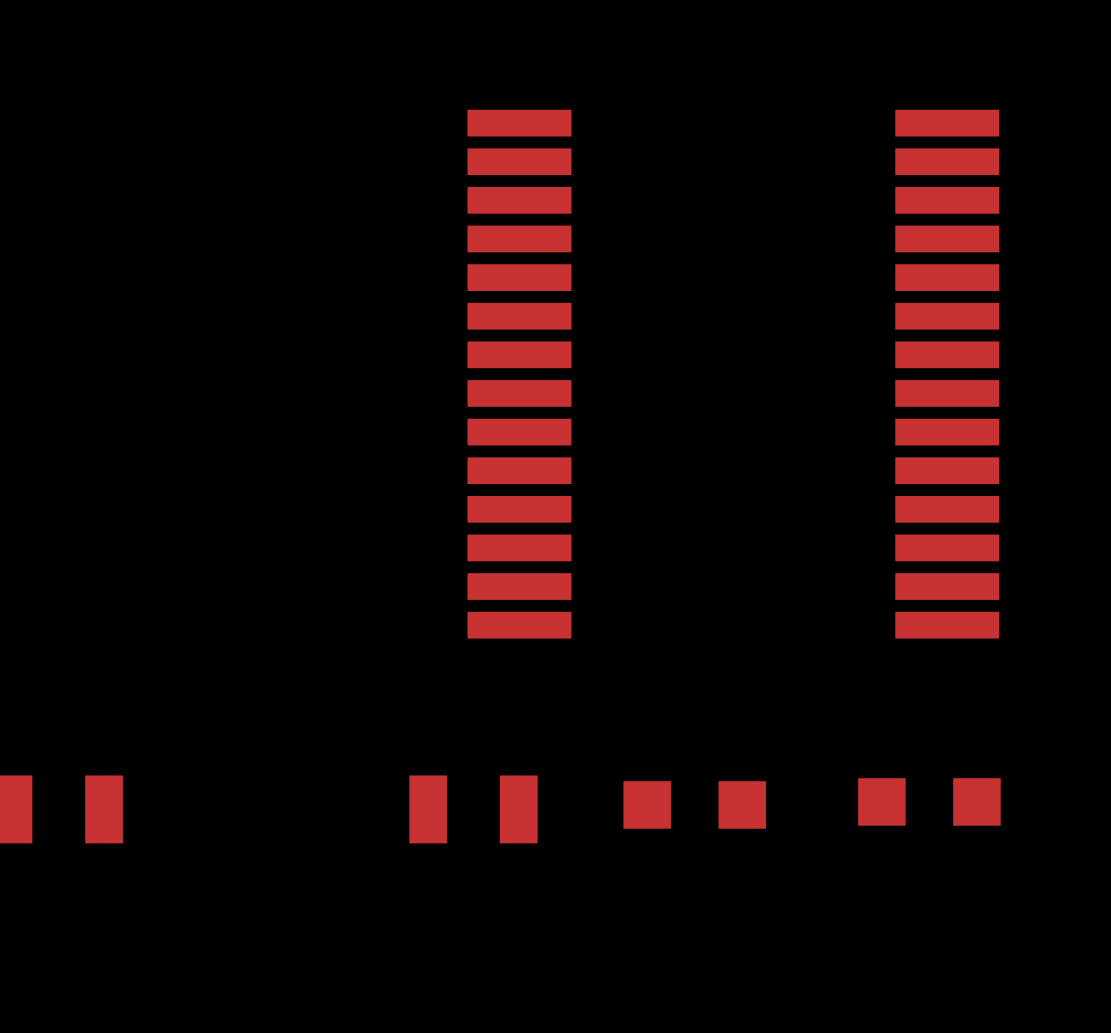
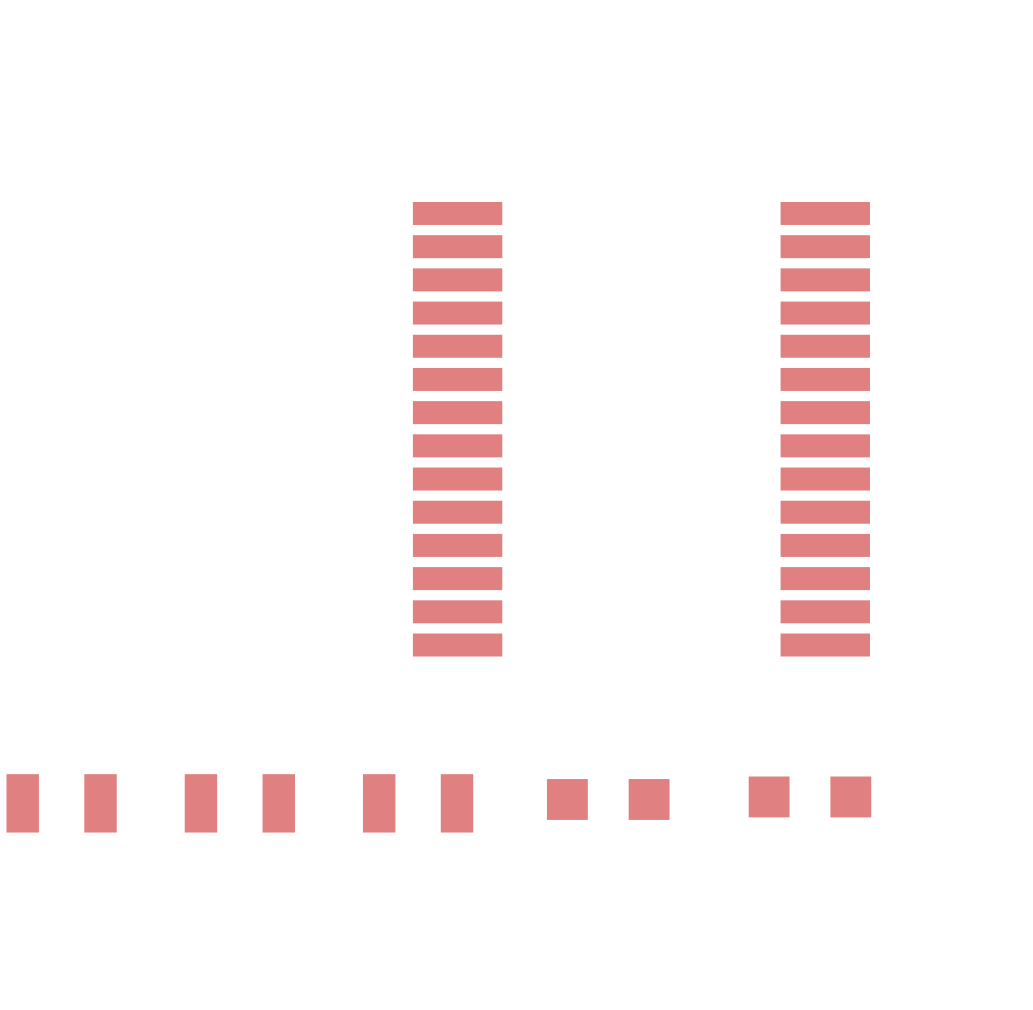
part: none -> (239, 803)

